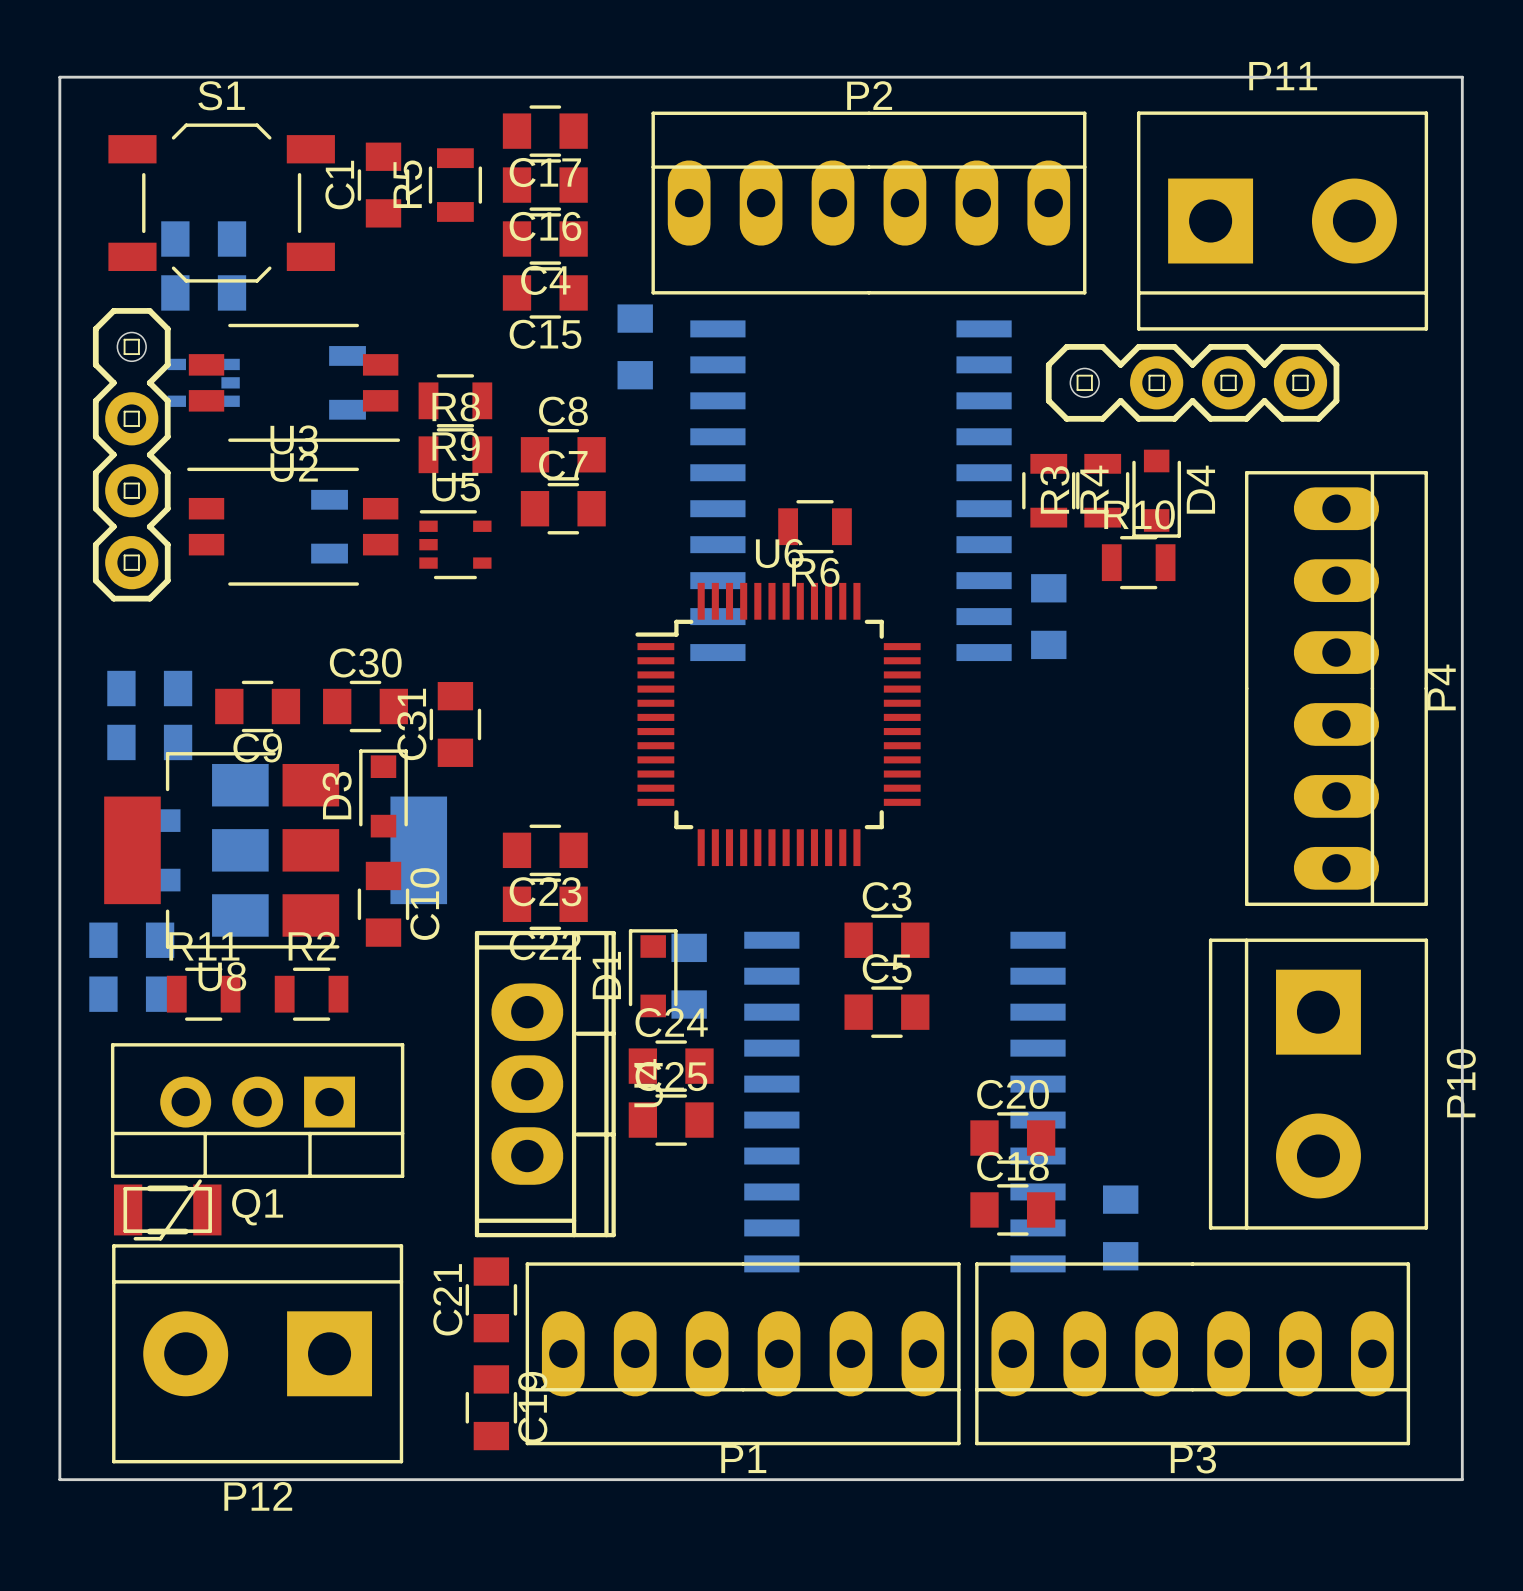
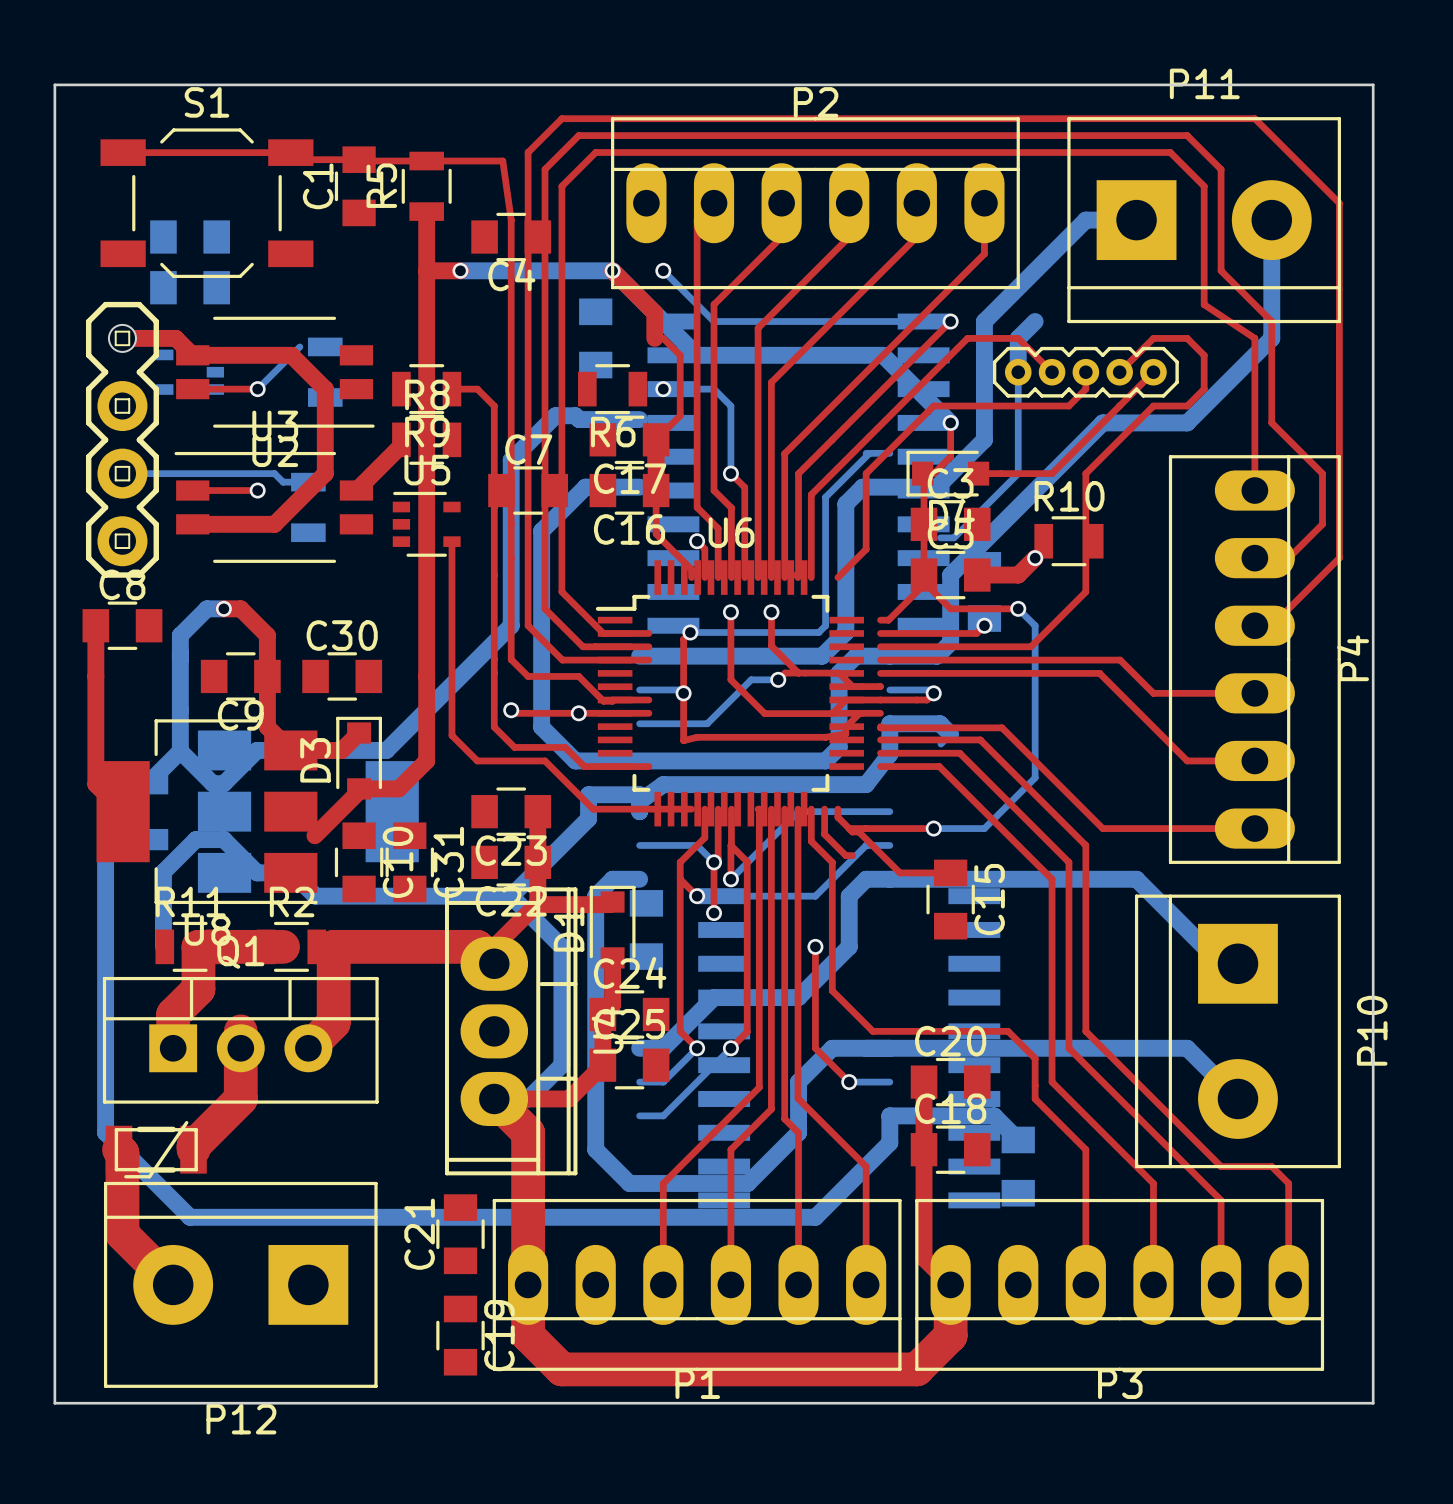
C17 position: (545, 131) -> (629, 439)
top track: none -> (123, 152) (290, 152) (297, 159) (502, 161) (511, 220) (511, 659) (528, 676) (578, 676) (603, 701) (648, 700)
C16 position: (545, 185) -> (629, 490)
top track: none -> (714, 203) (697, 220) (697, 507) (718, 528) (718, 577)
top track: none -> (781, 203) (781, 237) (714, 304) (714, 490) (731, 507) (731, 577)
top track: none -> (916, 203) (916, 237) (771, 382) (771, 577)
top track: none -> (984, 203) (984, 253) (784, 453) (784, 577)
top track: none -> (426, 211) (426, 760) (398, 788) (359, 788) (359, 791) (314, 835)
top track: none -> (832, 220) (849, 203) (849, 237) (758, 328) (758, 577)
bottom track: none -> (1136, 220) (1085, 220) (984, 321) (984, 439) (937, 487) (862, 487) (845, 504) (845, 632) (822, 656) (639, 656)
bottom track: none -> (1271, 220) (1271, 338) (1187, 422) (1102, 422) (950, 575) (950, 642) (937, 656) (856, 656) (839, 673) (839, 747) (825, 760) (575, 760) (541, 727) (541, 531) (585, 487) (639, 487)
top track: none -> (426, 270) (460, 270)
bottom track: none -> (460, 270) (612, 270) (697, 355) (883, 355) (950, 422)
via: none -> (460, 270)
top track: none -> (612, 270) (654, 313) (654, 338)
via: none -> (612, 270)
bottom track: none -> (663, 270) (714, 321) (950, 321)
via: none -> (663, 270)
C15 rotation: 0° (545, 292) -> 90° clockwise (950, 899)
C15 position: (545, 292) -> (950, 899)
top track: none -> (950, 321) (798, 473) (798, 577)
via: none -> (950, 321)
bottom track: none -> (1035, 321) (1018, 338) (1018, 473) (954, 537) (940, 537)
C15 name position: C15 (545, 334) -> C15 (989, 899)
top track: none -> (122, 338) (175, 338) (192, 355) (291, 355) (325, 389) (325, 473) (274, 524) (192, 524)
top track: none -> (654, 338) (663, 338) (680, 355) (680, 415) (656, 439) (656, 534) (691, 569) (691, 577)
bottom track: none -> (299, 346) (257, 389)
top track: none -> (1052, 372) (1018, 338) (967, 338) (811, 494) (811, 577)
top track: none -> (1085, 372) (1085, 389) (1068, 406) (933, 406) (866, 473) (866, 549) (837, 577)
part: none -> (1085, 372)
top track: none -> (1119, 372) (1153, 338) (1187, 338) (1204, 355) (1204, 389) (1187, 406) (1153, 406) (1085, 473) (1085, 591) (1031, 646) (880, 646)
part: (1192, 382) -> none
top track: none -> (1153, 372) (1052, 473) (978, 473)
top track: none -> (192, 389) (257, 389)
via: none -> (257, 389)
top track: none -> (451, 389) (477, 389) (494, 406) (494, 727) (514, 747) (565, 747) (584, 766) (648, 766)
bottom track: none -> (663, 389) (714, 389) (730, 406) (730, 473)
via: none -> (663, 389)
bottom track: none -> (639, 419) (579, 419) (575, 415) (555, 415) (511, 460) (511, 625) (386, 750) (257, 750) (223, 783) (212, 783) (180, 751)
top track: none -> (950, 422) (950, 456) (933, 473) (922, 473) (924, 584) (888, 620) (880, 620)
via: none -> (950, 422)
top track: none -> (401, 439) (401, 445) (356, 490)
C8 position: (563, 454) -> (122, 625)
bottom track: none -> (866, 453) (889, 453)
bottom track: none -> (869, 453) (825, 497) (825, 625) (818, 632) (690, 632)
bottom track: none -> (122, 473) (274, 473) (283, 482) (308, 482)
top track: none -> (730, 473) (744, 487) (744, 577)
via: none -> (730, 473)
R4: (1048, 490) -> none
R3: (1102, 490) -> none
D4 rotation: 0° (1156, 493) -> 90° clockwise (947, 473)
D4 position: (1156, 493) -> (947, 473)
top track: none -> (192, 490) (257, 490)
via: none -> (257, 490)
top track: none -> (1254, 490) (1254, 338) (1204, 304) (1204, 186) (1170, 152) (595, 152) (561, 186) (561, 591) (603, 633) (648, 633)
R6 position: (815, 526) -> (612, 389)
top track: none -> (697, 541) (704, 548) (704, 577)
via: none -> (697, 541)
top track: none -> (451, 541) (451, 735) (477, 760) (545, 760) (593, 809) (691, 809)
top track: none -> (1035, 558) (1018, 575) (977, 575)
via: none -> (1035, 558)
top track: none -> (1254, 558) (1288, 558) (1322, 524) (1322, 473) (1271, 422) (1271, 321) (1221, 270) (1221, 169) (1187, 135) (578, 135) (545, 169) (545, 608) (582, 646) (648, 646)
top track: none -> (924, 582) (950, 608) (1018, 608)
top track: none -> (223, 608) (240, 608) (267, 635) (267, 727) (290, 750) (341, 750) (359, 733)
bottom track: none -> (223, 608) (206, 608) (180, 635) (180, 751)
via: none -> (223, 608)
bottom track: none -> (1018, 608) (1035, 625) (1035, 777) (984, 828) (933, 828)
via: none -> (1018, 608)
top track: none -> (730, 612) (730, 679) (764, 713) (832, 713) (845, 700) (927, 700) (933, 693)
via: none -> (730, 612)
top track: none -> (771, 612) (771, 646) (798, 673)
via: none -> (771, 612)
top track: none -> (94, 624) (95, 784) (123, 811)
top track: none -> (984, 625) (976, 633) (880, 633)
via: none -> (984, 625)
top track: none -> (1254, 625) (1271, 625) (1339, 558) (1339, 203) (1254, 118) (561, 118) (528, 152) (528, 625) (562, 660) (648, 660)
top track: none -> (690, 632) (683, 639) (683, 740) (697, 737) (825, 737) (845, 733) (845, 727) (859, 713) (880, 713)
via: none -> (690, 632)
part: (149, 688) -> none
top track: none -> (880, 660) (1120, 660) (1153, 693) (1254, 693)
top track: none -> (880, 673) (1099, 673) (1187, 760) (1254, 760)
top track: none -> (778, 679) (785, 673) (839, 673) (852, 686) (880, 686)
bottom track: none -> (778, 679) (751, 679) (707, 723) (639, 723)
via: none -> (778, 679)
bottom track: none -> (639, 689) (680, 689) (683, 693)
bottom track: none -> (889, 689) (930, 689) (933, 693)
C31 name position: C31 (411, 724) -> C31 (448, 862)
C31 position: (455, 724) -> (409, 862)
via: none -> (683, 693)
via: none -> (933, 693)
part: (149, 742) -> none
top track: none -> (511, 710) (514, 713) (648, 713)
via: none -> (511, 710)
via: none -> (578, 713)
top track: none -> (880, 726) (1002, 727) (1102, 828) (1254, 828)
top track: none -> (880, 739) (980, 739) (1085, 845) (1085, 1031) (1221, 1166) (1271, 1166) (1288, 1183) (1288, 1284)
bottom track: none -> (940, 744) (950, 734) (940, 723) (889, 723) (889, 754) (866, 784) (663, 784) (639, 801)
bottom track: none -> (180, 751) (105, 826) (105, 1132) (190, 1217) (815, 1217) (889, 1142) (889, 1115) (994, 1115) (1018, 1139)
top track: none -> (880, 753) (959, 753) (1068, 862) (1068, 1048) (1221, 1200) (1221, 1284)
top track: none -> (880, 766) (939, 766) (1052, 879) (1052, 1082) (1153, 1183) (1153, 1284)
top track: none -> (704, 809) (704, 837) (680, 862) (680, 1031) (697, 1048)
top track: none -> (718, 809) (718, 858) (714, 862) (714, 913)
top track: none -> (731, 809) (731, 845)
top track: none -> (758, 809) (759, 1087) (663, 1183) (663, 1284)
top track: none -> (771, 809) (771, 1109) (730, 1149) (730, 1284)
top track: none -> (784, 809) (784, 1118) (798, 1132) (798, 1284)
top track: none -> (798, 809) (798, 1098) (866, 1166) (866, 1284)
top track: none -> (811, 809) (811, 841) (832, 862) (832, 990) (872, 1031) (1008, 1031) (1035, 1058) (1035, 1098) (1085, 1149) (1085, 1284)
top track: none -> (824, 809) (824, 834) (845, 855) (852, 855)
top track: none -> (837, 809) (837, 817) (852, 831) (858, 831) (899, 872) (950, 872)
top track: none -> (537, 811) (537, 903) (494, 946) (494, 963) (477, 946) (333, 946) (333, 1023) (308, 1048)
bottom track: none -> (639, 811) (639, 794) (588, 794) (588, 818) (511, 896)
bottom track: none -> (889, 811) (798, 811) (730, 879)
top track: none -> (849, 828) (933, 828)
via: none -> (933, 828)
bottom track: none -> (639, 845) (697, 845) (714, 862)
bottom track: none -> (889, 845) (866, 845) (815, 896) (697, 896)
via: none -> (714, 862)
bottom track: none -> (639, 879) (612, 879) (595, 896) (595, 1149) (629, 1183) (747, 1183) (798, 1132) (798, 1082) (832, 1048) (1187, 1048) (1237, 1098)
top track: none -> (680, 879) (697, 896)
top track: none -> (730, 879) (730, 845) (747, 861) (747, 1031) (730, 1048)
via: none -> (730, 879)
part: (131, 940) -> none
bottom track: none -> (511, 896) (561, 946) (561, 1065) (528, 1098) (494, 1098)
bottom track: none -> (511, 896) (315, 896) (292, 872) (257, 872) (223, 839) (195, 839) (163, 872) (163, 946)
via: none -> (697, 896)
C3 position: (886, 940) -> (950, 524)
top track: none -> (612, 902) (610, 904) (536, 904)
via: none -> (714, 913)
part: (131, 994) -> none
top track: none -> (283, 946) (198, 946) (198, 989) (173, 1014) (173, 1048)
top track: none -> (815, 946) (815, 1048) (849, 1082)
via: none -> (815, 946)
top track: none -> (612, 957) (612, 1004) (602, 1014) (602, 1065) (569, 1098) (494, 1098) (528, 1132) (528, 1335) (561, 1369) (916, 1369) (950, 1335) (950, 1284) (924, 1258) (924, 1082)
C5 position: (886, 1012) -> (950, 575)
bottom track: none -> (1237, 963) (1221, 963) (1136, 879) (866, 879) (849, 896) (849, 946) (798, 997) (714, 997) (663, 1048) (639, 1048)
top track: none -> (240, 1031) (240, 1098) (193, 1146) (193, 1149)
bottom track: none -> (697, 1048) (663, 1082) (639, 1082)
via: none -> (697, 1048)
bottom track: none -> (730, 1048) (663, 1115) (639, 1115)
via: none -> (730, 1048)
Q1 rotation: 0° (257, 1110) -> 180° (240, 1040)
bottom track: none -> (849, 1082) (889, 1082)
via: none -> (849, 1082)
top track: none -> (119, 1149) (122, 1153) (122, 1234) (173, 1284)
part position: (1120, 1227) -> (1018, 1166)

